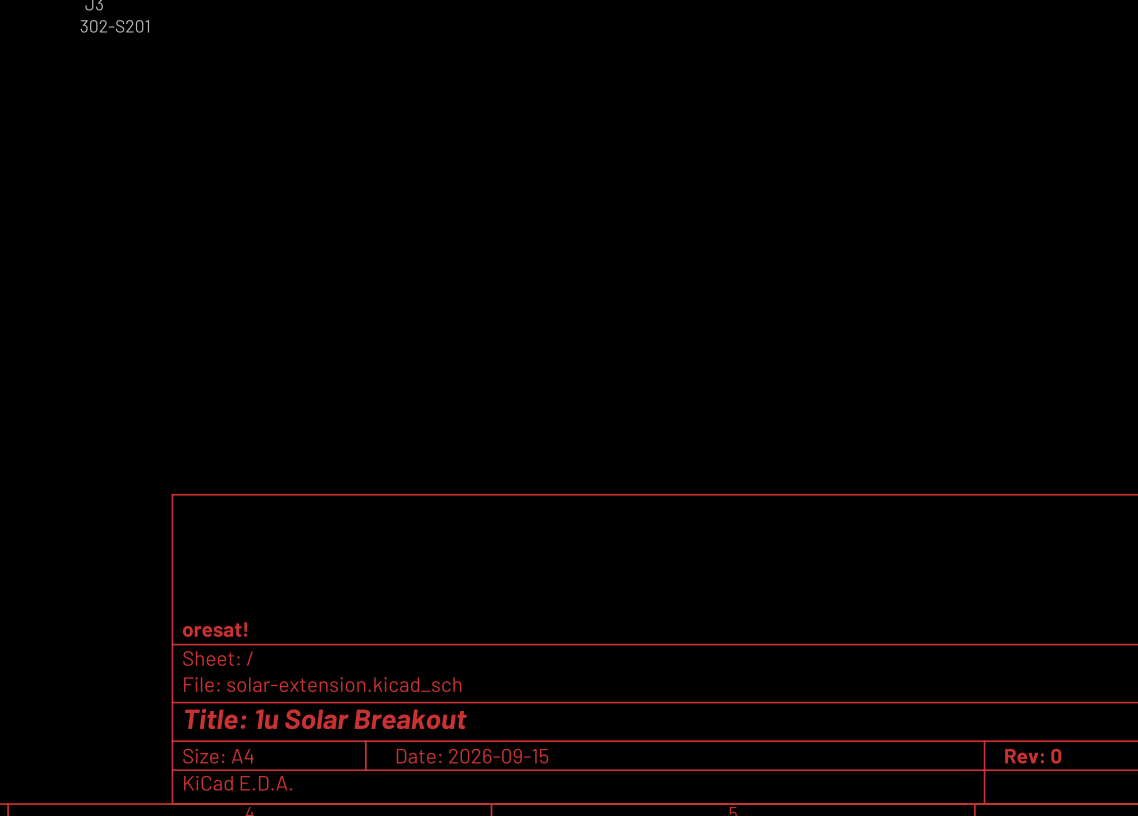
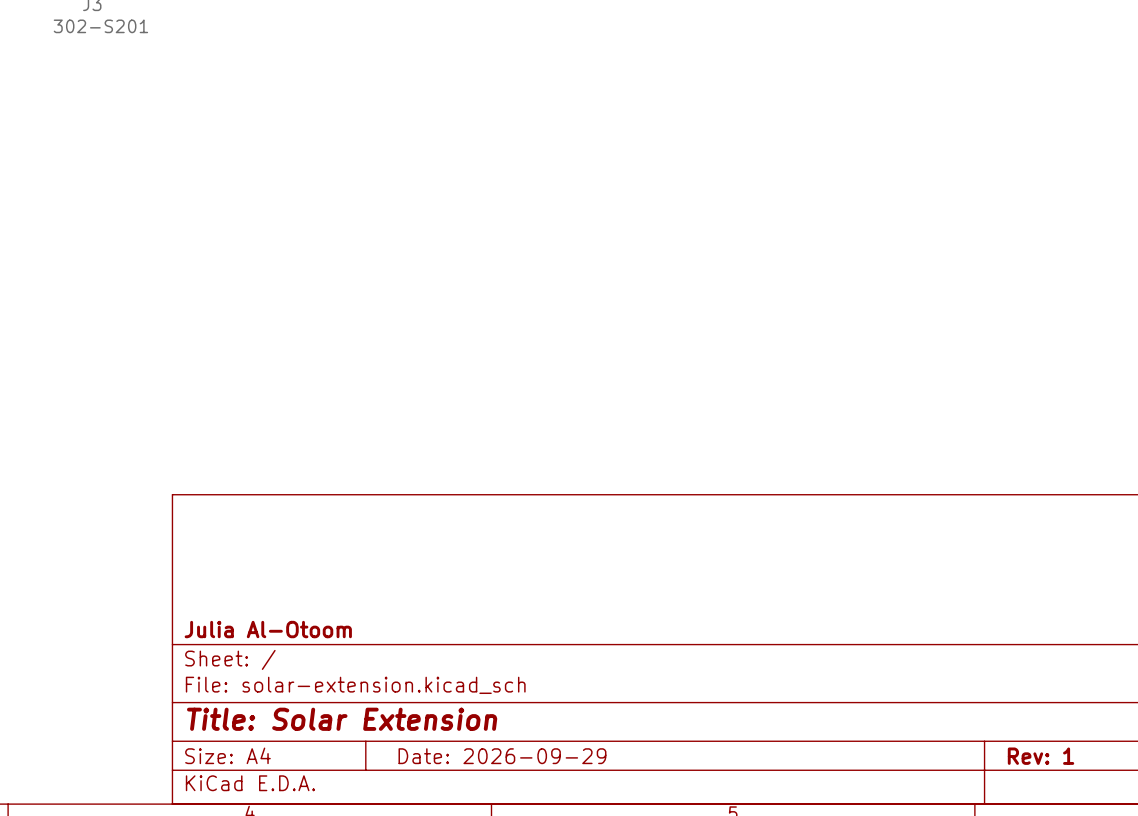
title block: oresat! (215, 629) -> Julia Al-Otoom (268, 629)
title block: Title: 1u Solar Breakout (325, 718) -> Title: Solar Extension (342, 719)
title block: Date: 2026-09-15 (472, 756) -> Date: 2026-09-29 (502, 756)
title block: Rev: 0 (1033, 756) -> Rev: 1 (1041, 756)

